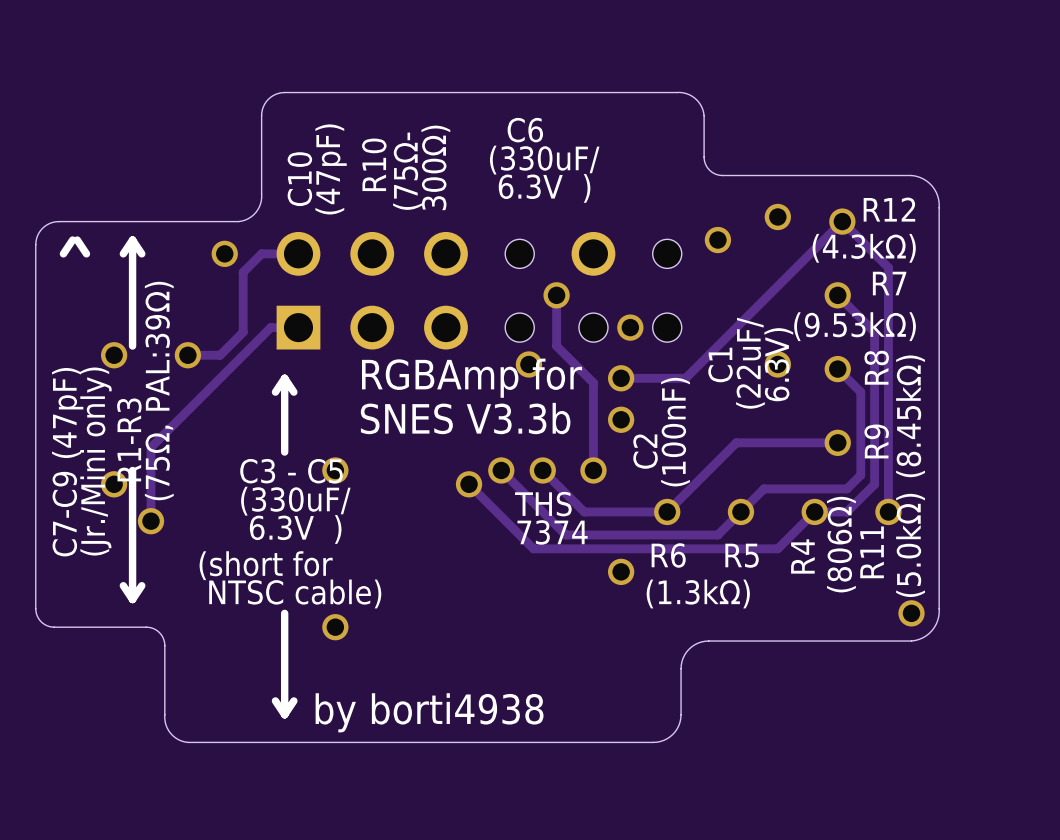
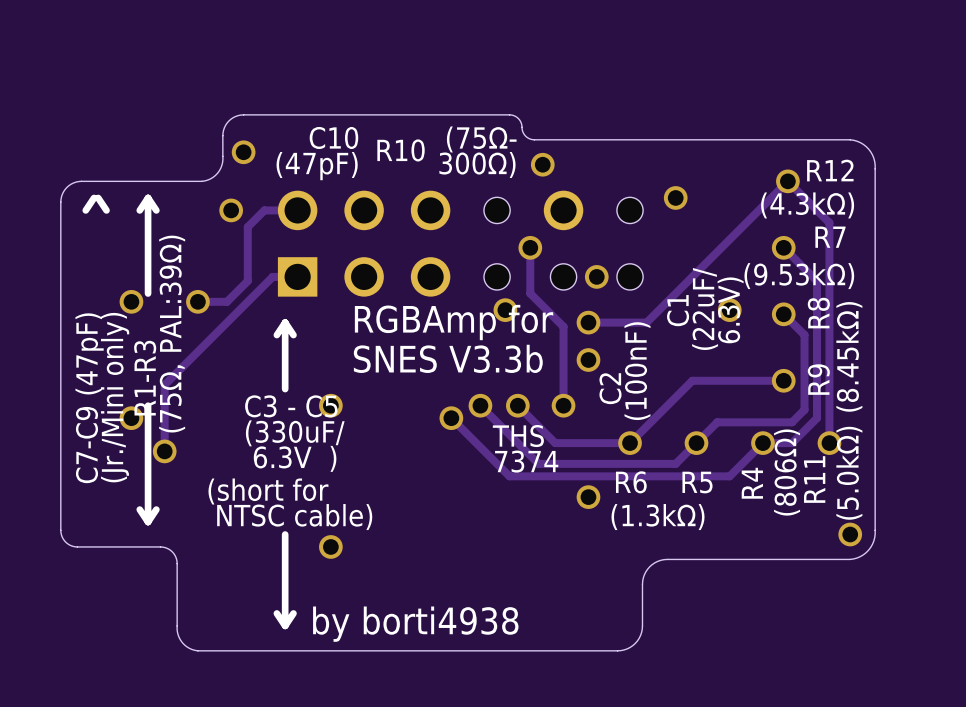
text: C6 (525, 130) -> none
text: (330uF/ (544, 160) -> none
text rotation: 0° (374, 164) -> 90° clockwise (401, 150)
text rotation: 0° (435, 167) -> 90° clockwise (477, 164)
text rotation: 0° (331, 169) -> 90° clockwise (317, 166)
text rotation: 0° (407, 171) -> 90° clockwise (481, 139)
board edge: (722, 175) (711, 171) (704, 161) (704, 115) (701, 106) (692, 96) (683, 92) (281, 92) (268, 99) (262, 109) (261, 197) (257, 209) (250, 217) (241, 221) (192, 221) -> (679, 139) (532, 139) (524, 134) (518, 118) (509, 114) (240, 115) (230, 119) (224, 127) (222, 162) (219, 170) (213, 177) (202, 181)
text rotation: 0° (299, 179) -> 90° clockwise (333, 137)
text: 6.3V ) (544, 188) -> none
via: none -> (243, 152)
via: none -> (542, 164)
via: (777, 216) -> none

